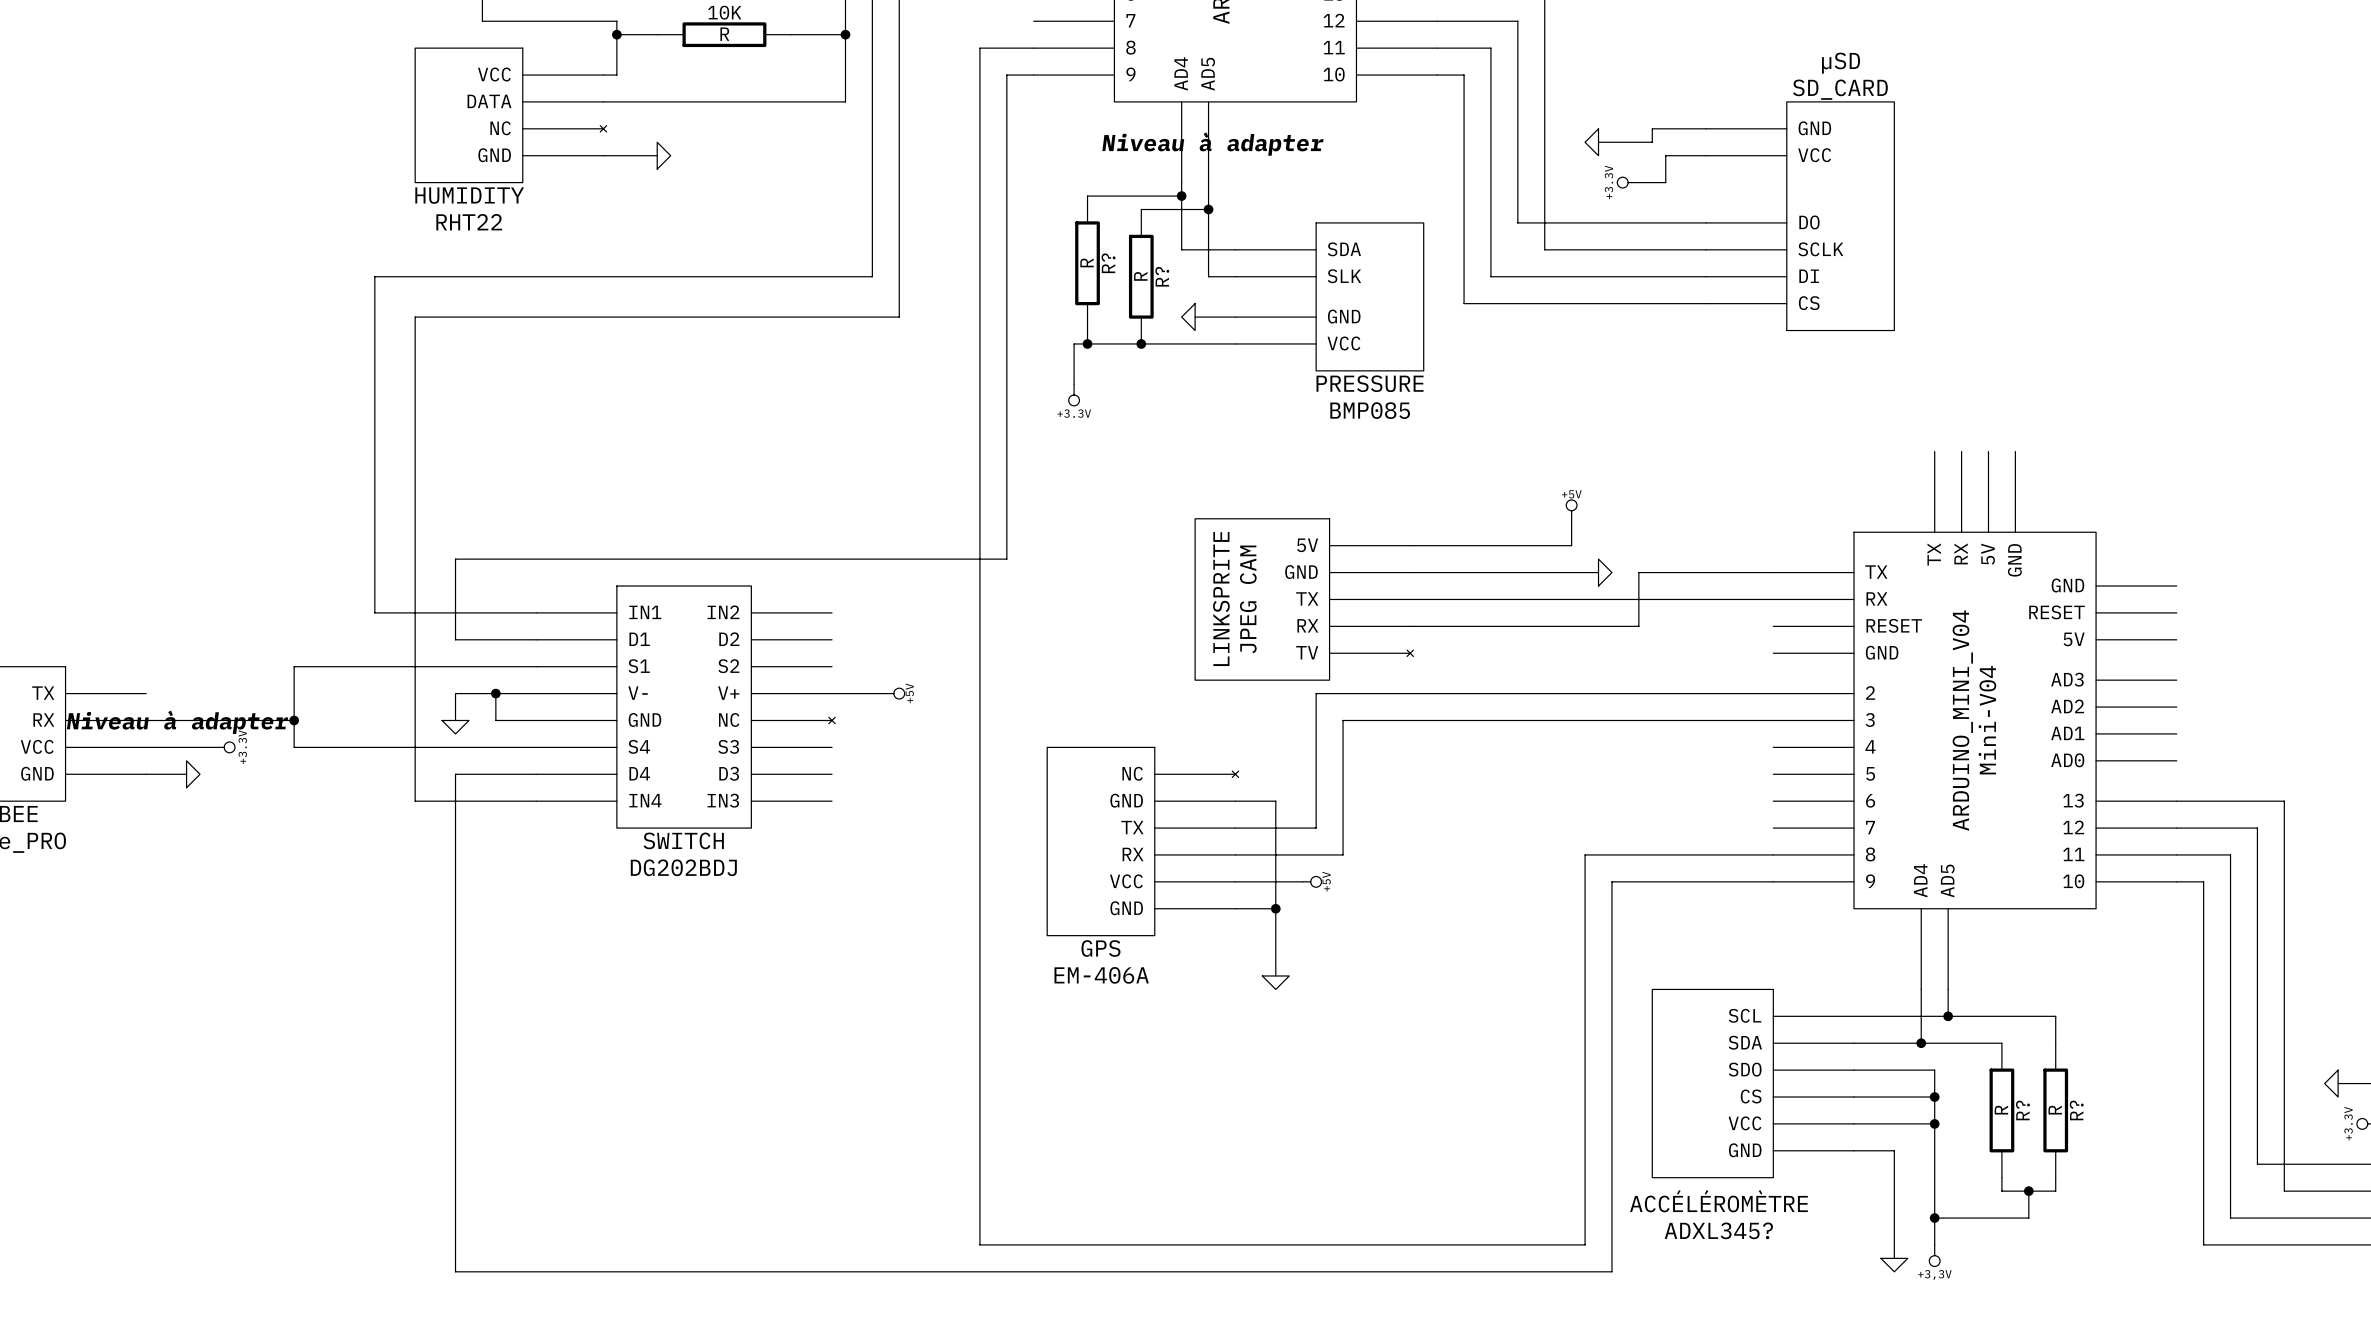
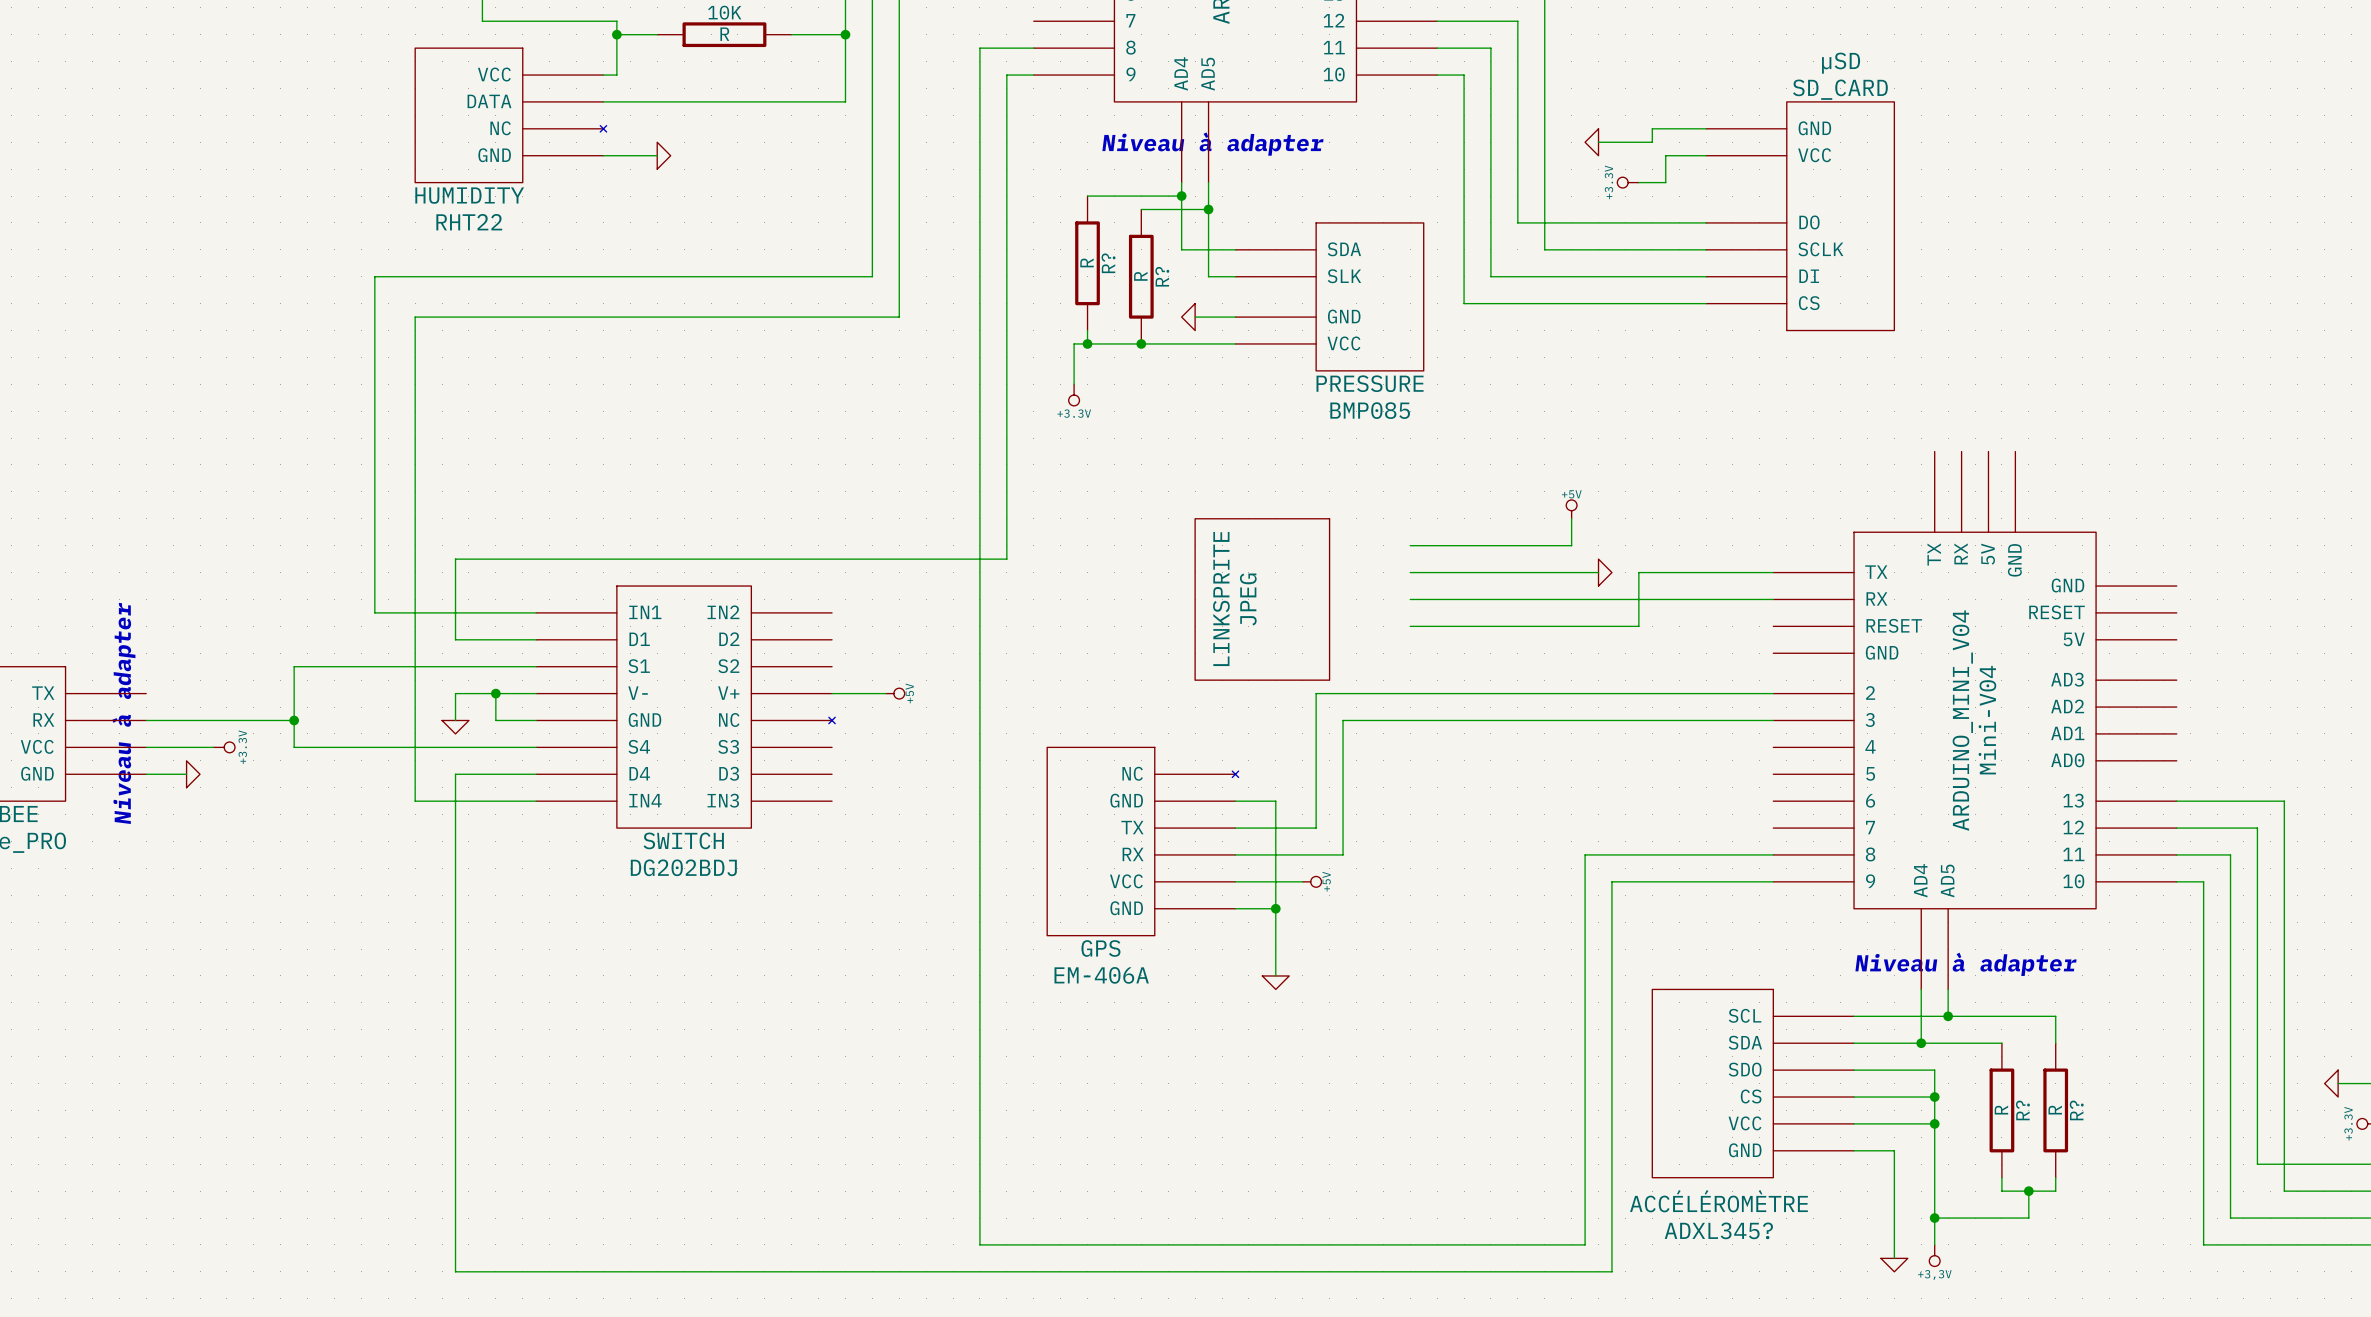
JPEG: none -> LINKSPRITE (1262, 599)
JPEG CAM: LINKSPRITE (1304, 599) -> none
text rotation: 0° (177, 722) -> 90° counterclockwise (123, 713)
text: none -> Niveau à adapter (1965, 964)

